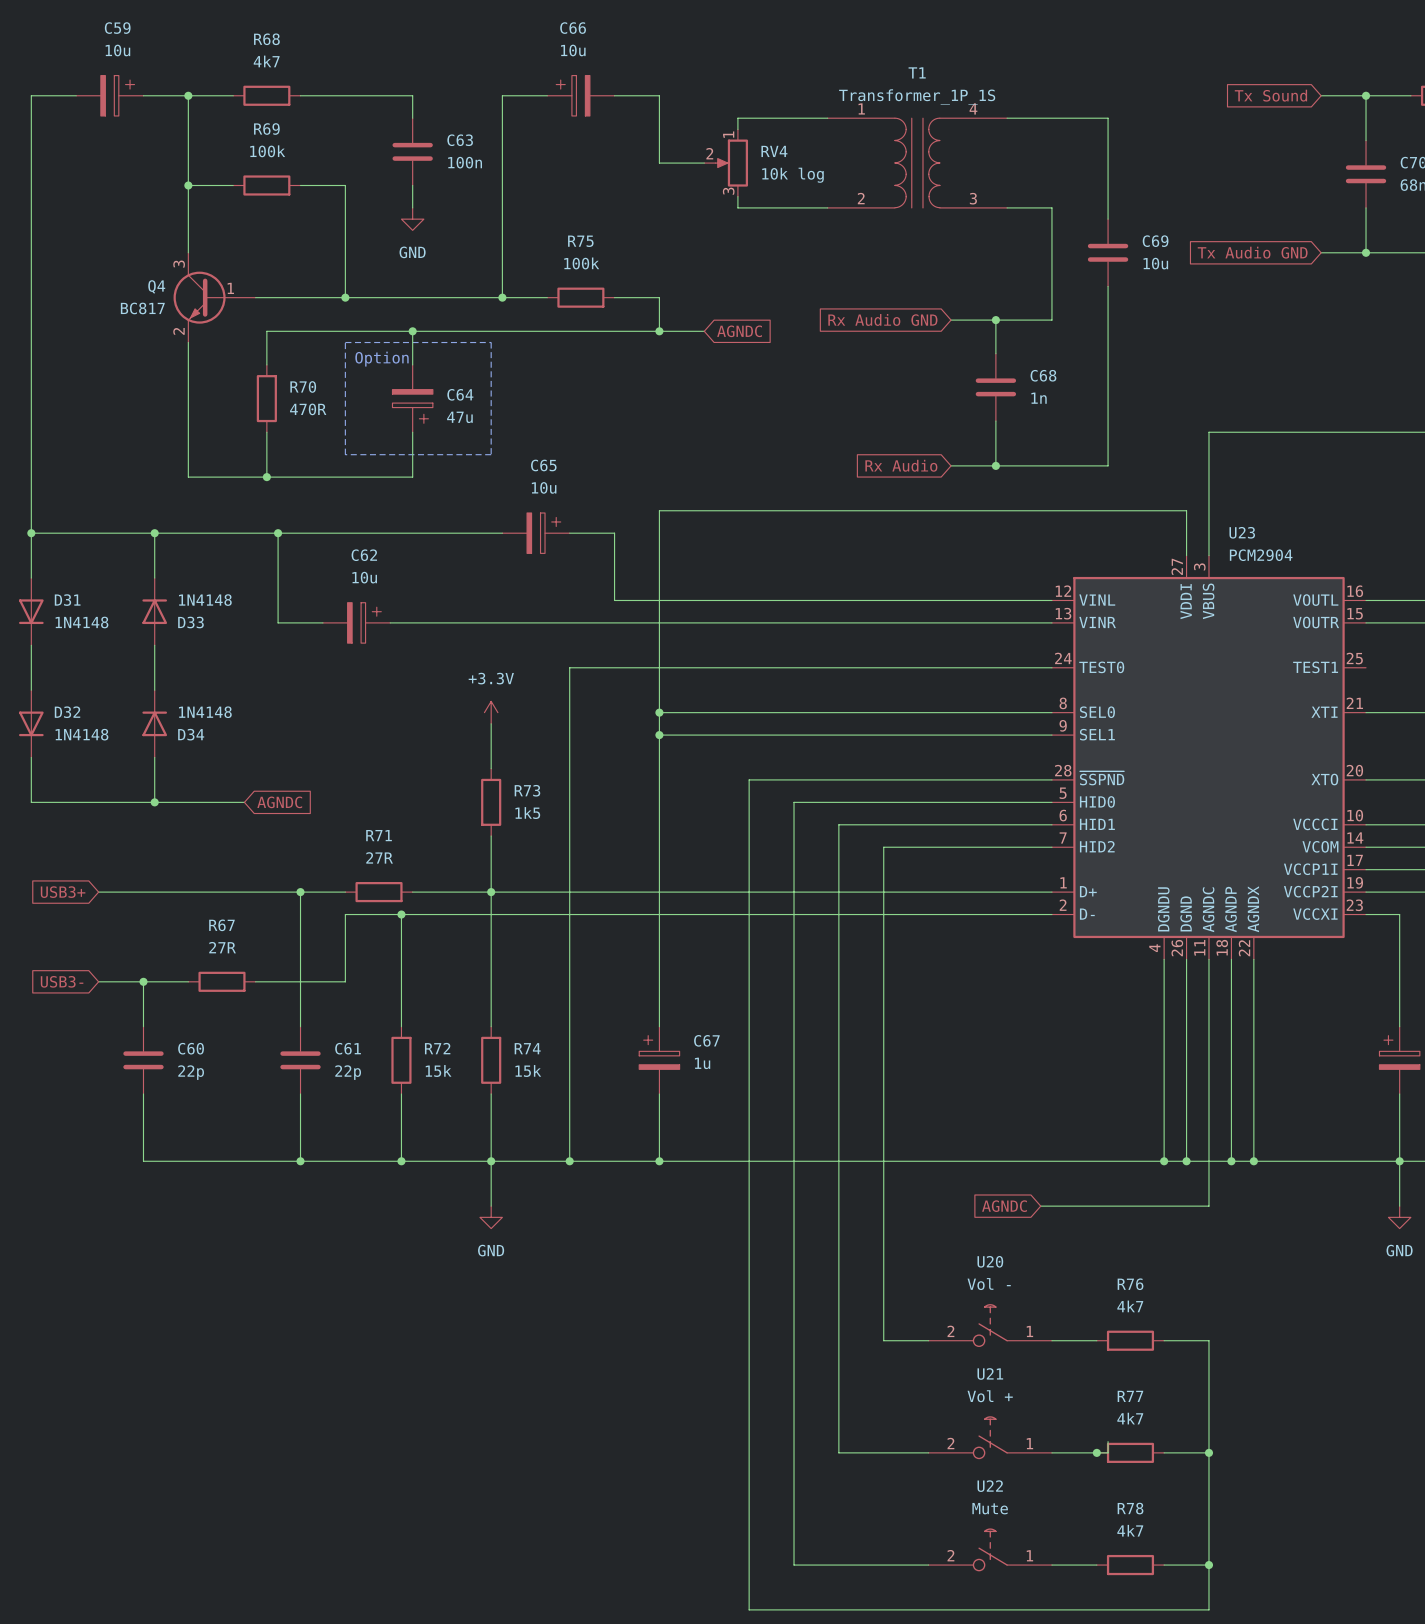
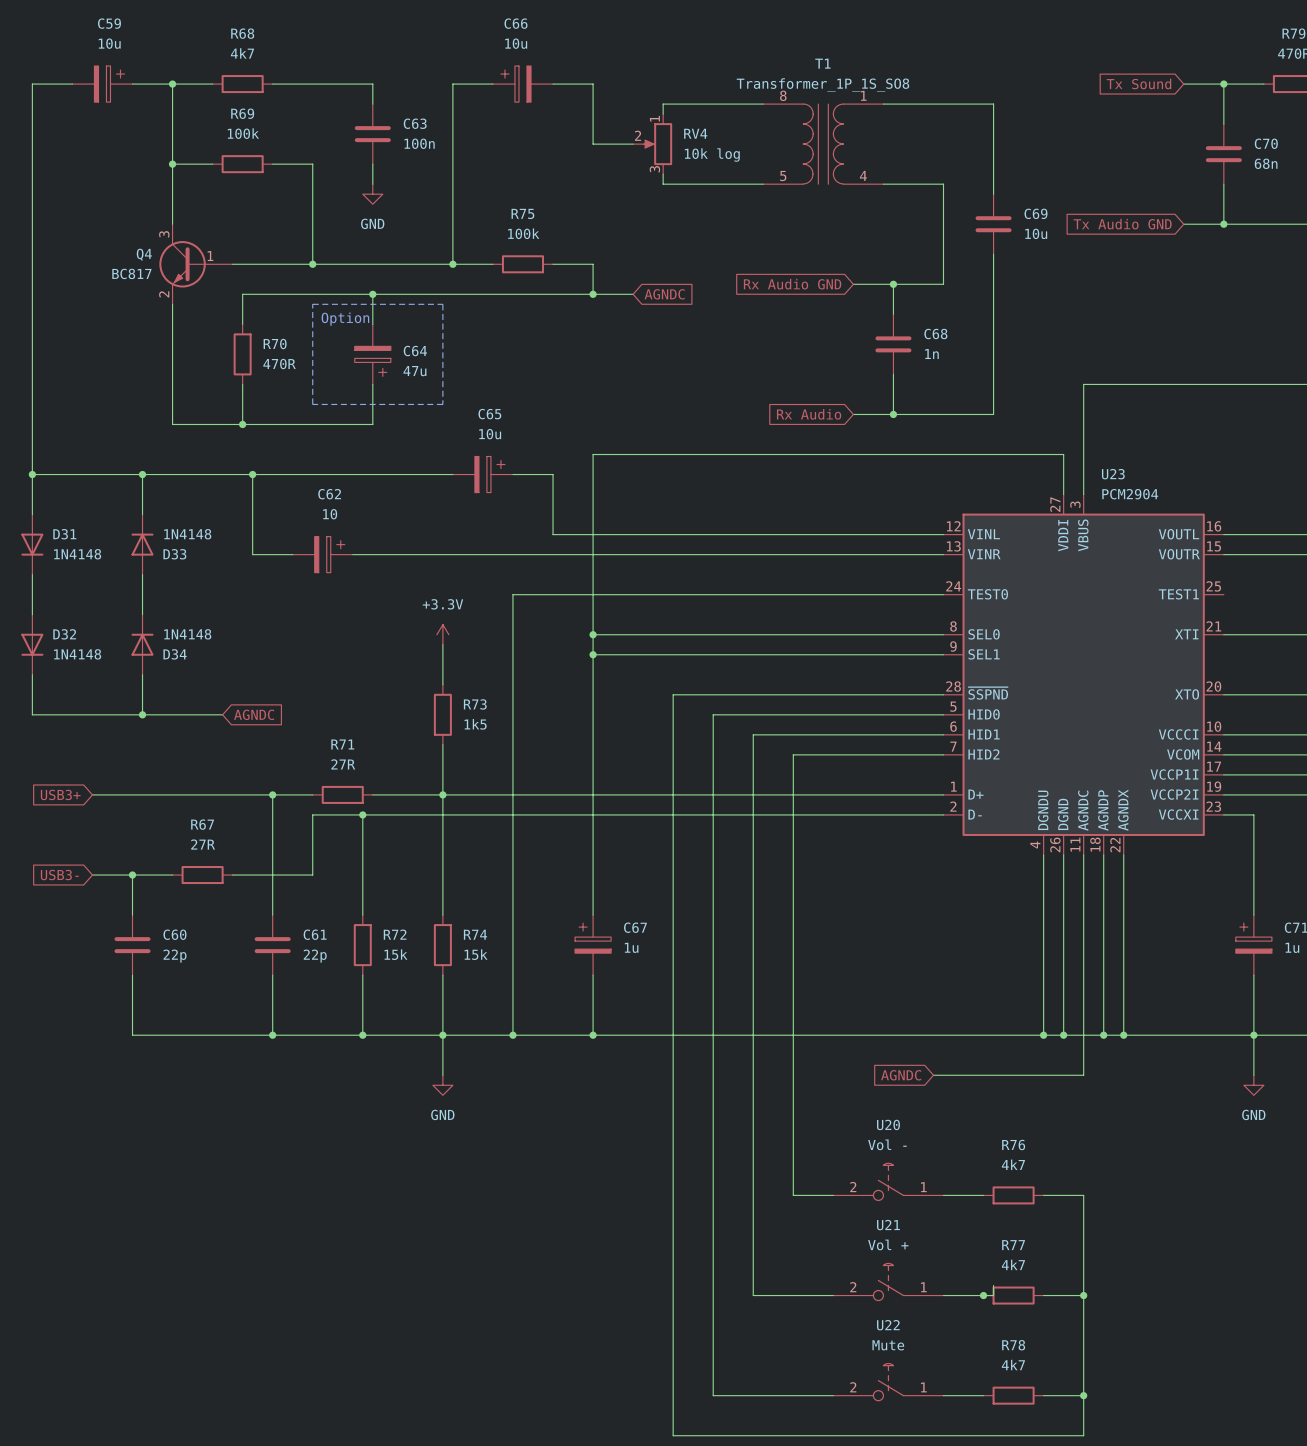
T1 value: Transformer_1P_1S (917, 96) -> Transformer_1P_1S_SO8 (822, 85)
T1 symbol: [827, 118, 1008, 208] -> [763, 104, 884, 185]
C62 value: 10u (364, 577) -> 10 (330, 514)

